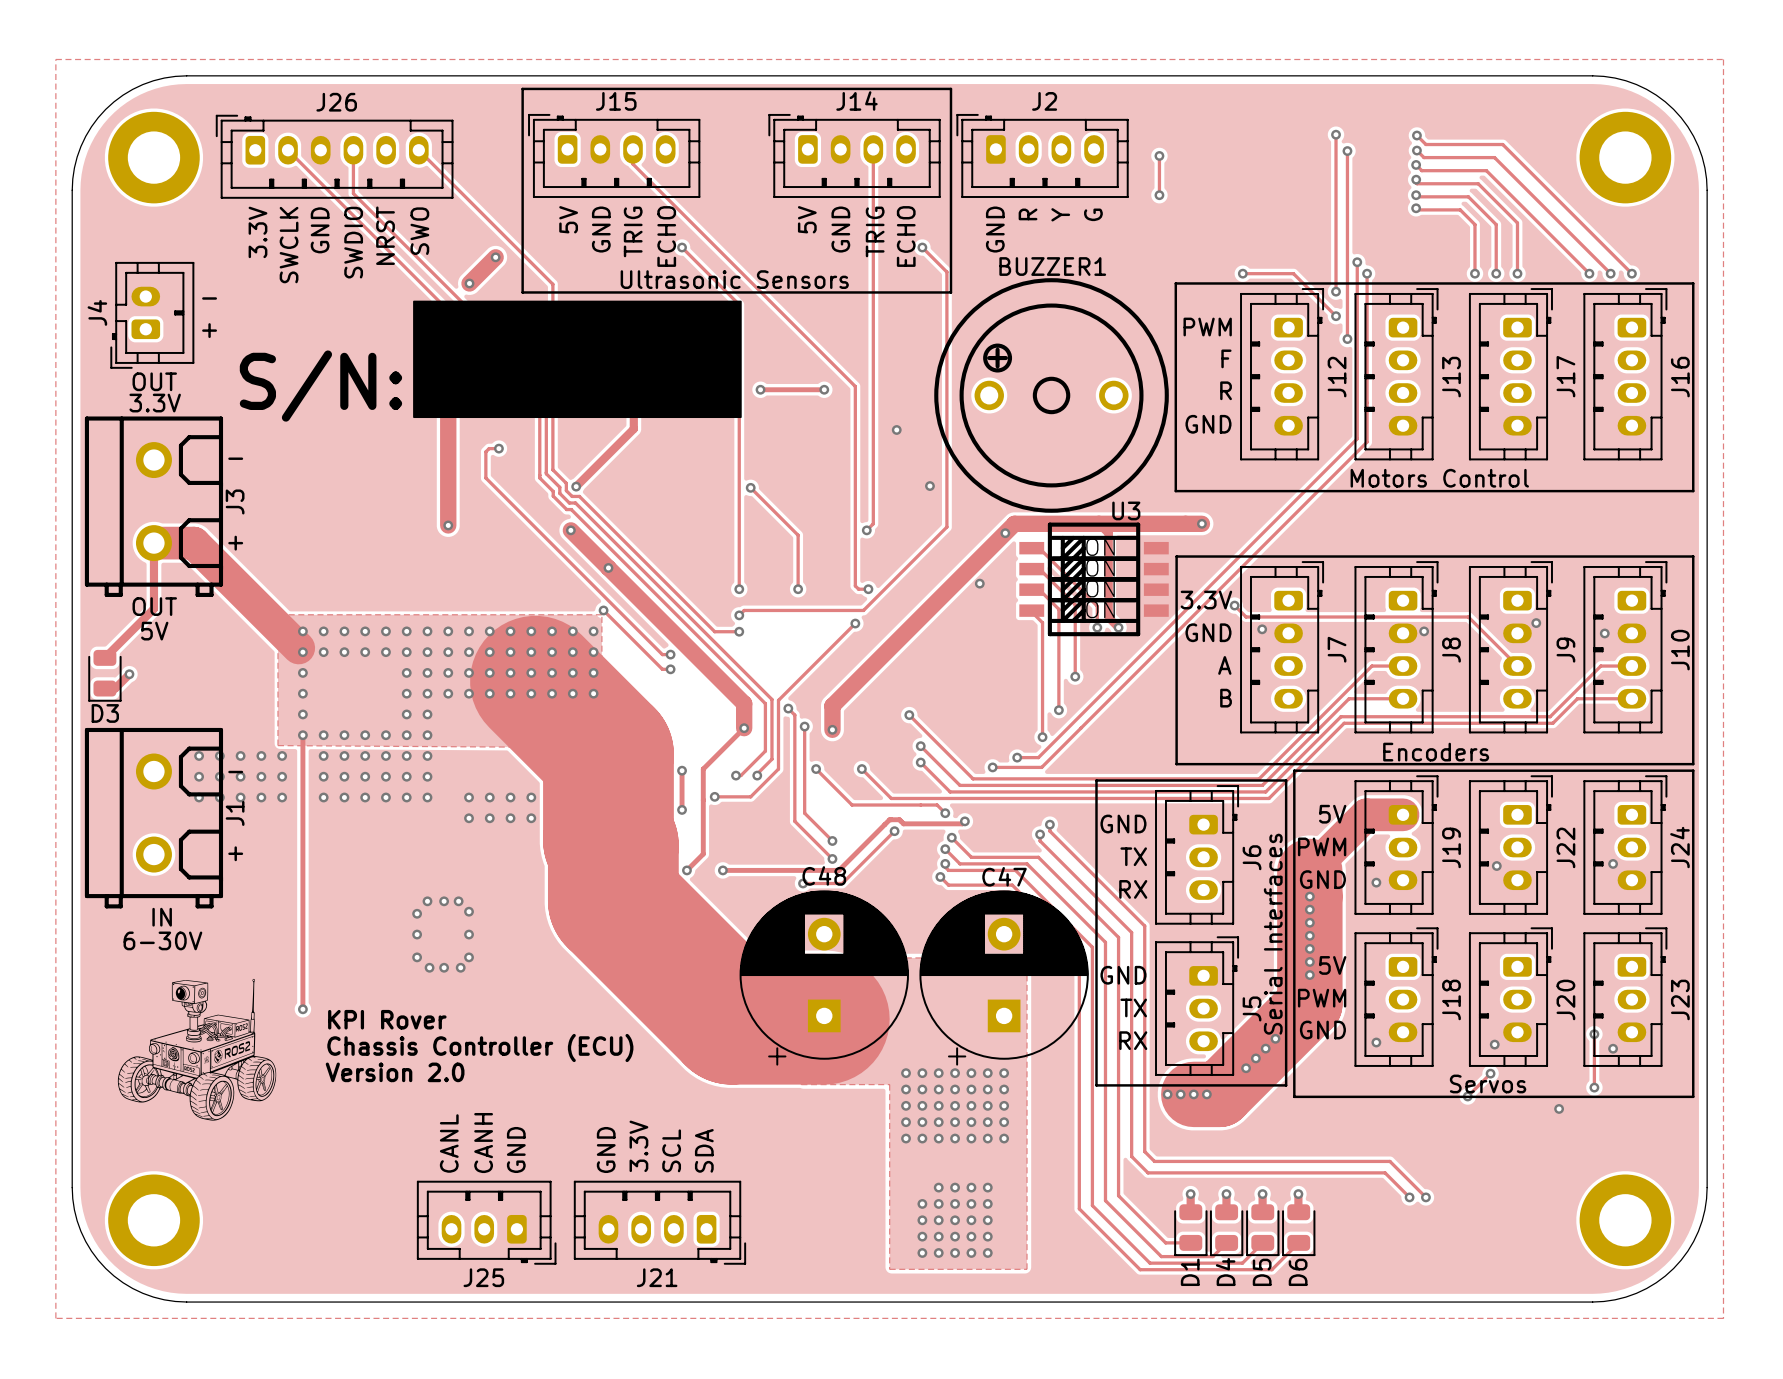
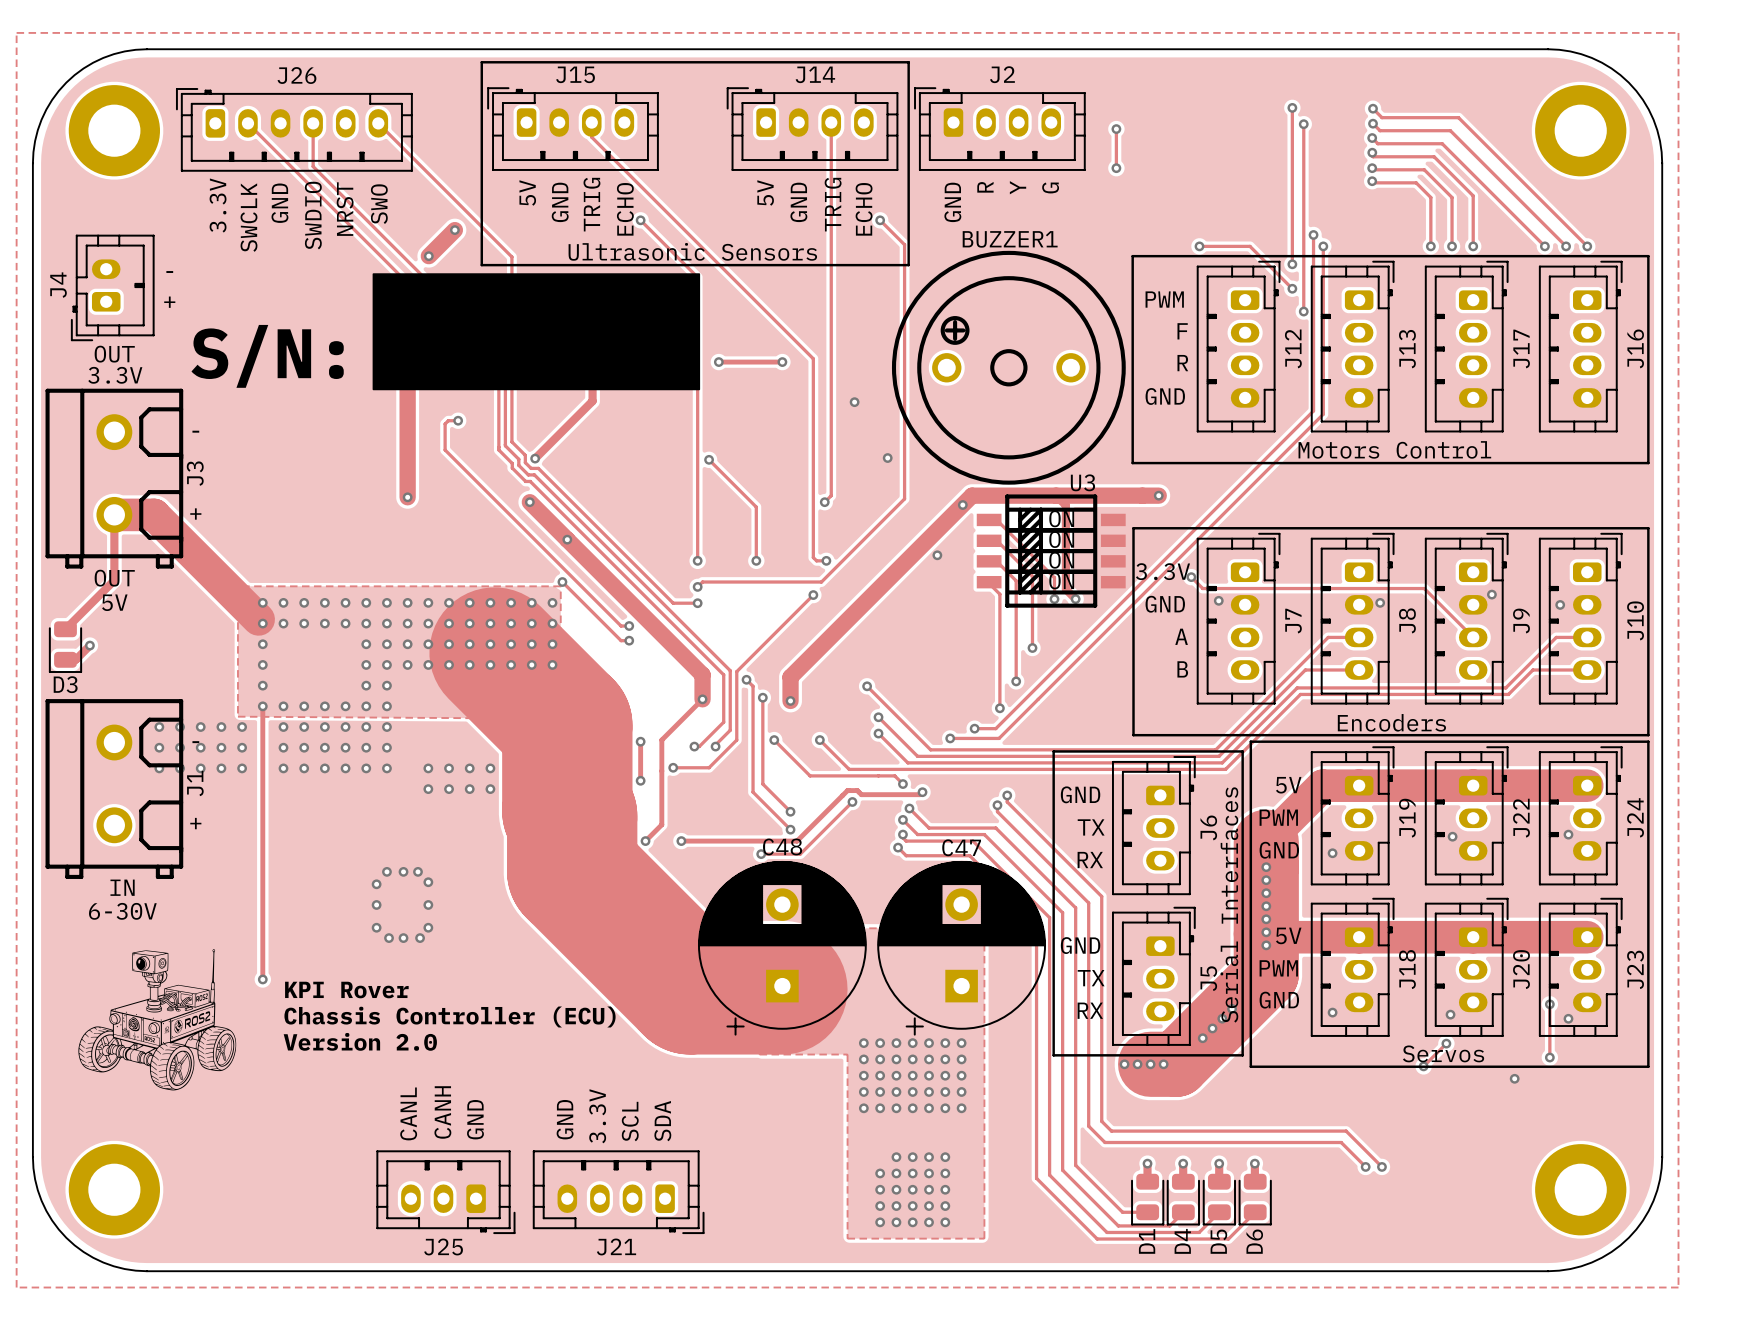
track: none -> (1359, 785) (1587, 785)
track: none -> (1266, 933) (1269, 937) (1587, 937)

